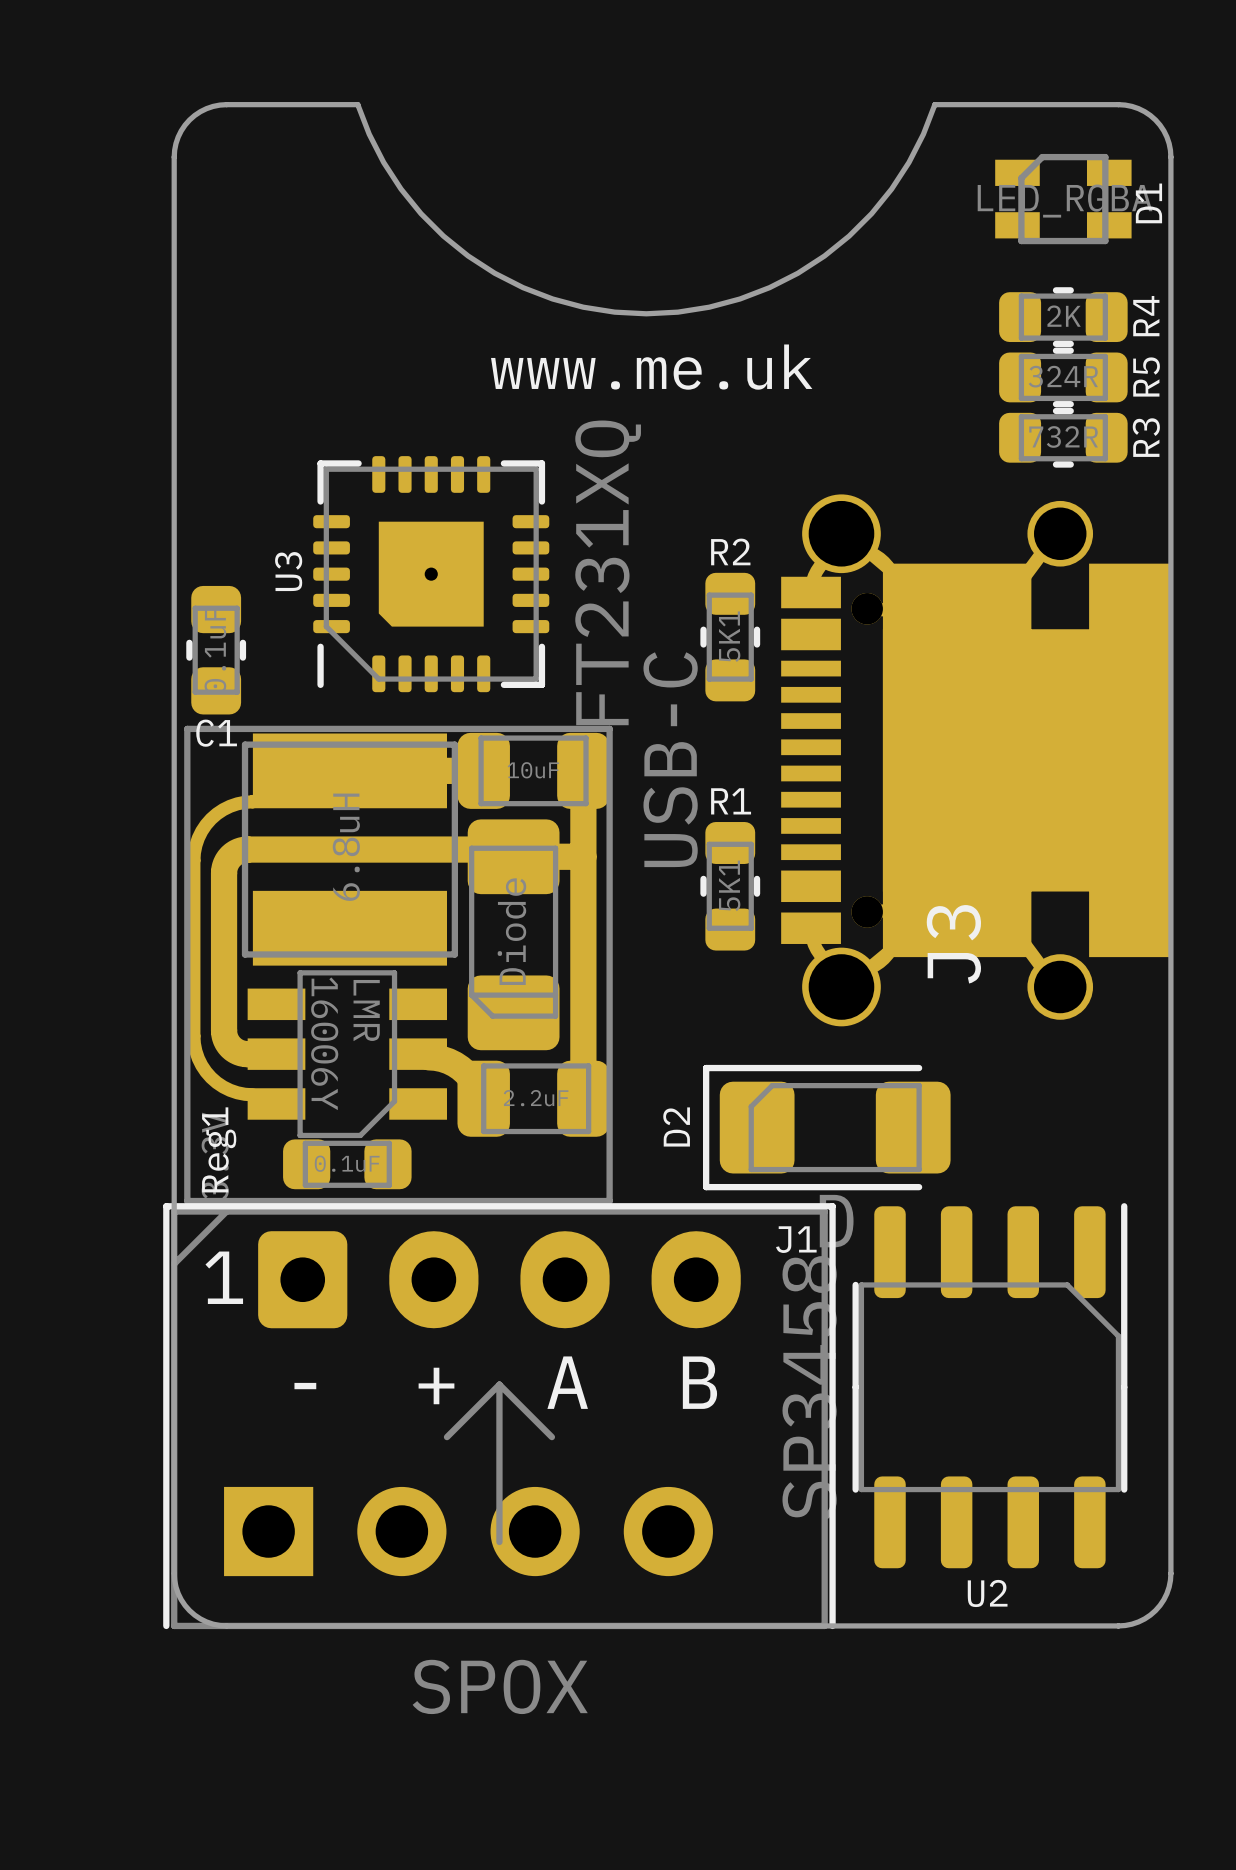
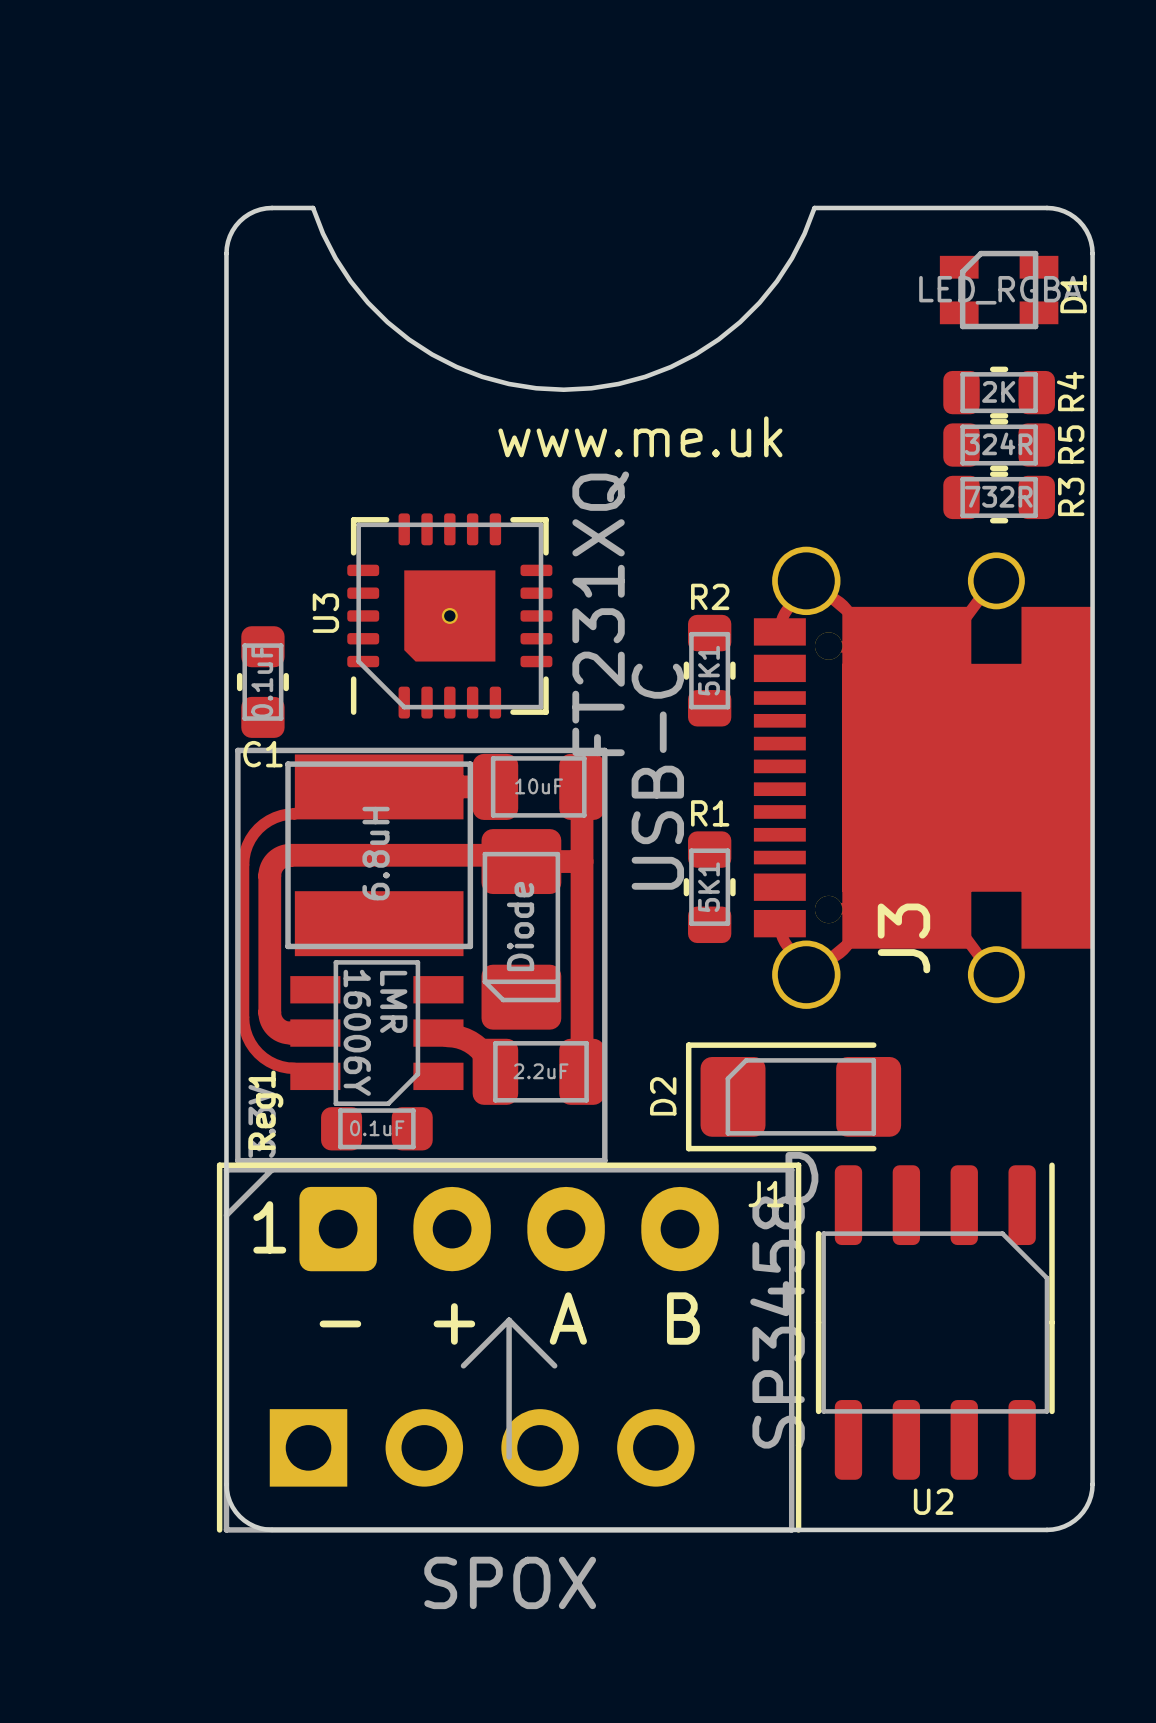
board edge: (273, 104) (357, 104) (369, 134) (383, 162) (401, 189) (421, 213) (443, 236) (468, 256) (494, 273) (523, 287) (552, 298) (583, 307) (614, 312) (646, 313) (678, 312) (709, 307) (739, 298) (769, 287) (797, 273) (824, 256) (849, 236) (871, 213) (891, 189) (908, 162) (923, 134) (934, 104) -> (313, 207) (323, 233) (350, 281) (387, 322) (408, 339) (456, 367) (482, 376) (509, 383) (563, 389) (591, 388) (645, 376) (670, 367) (718, 339) (740, 322) (776, 281) (804, 233) (814, 207) (887, 207)

